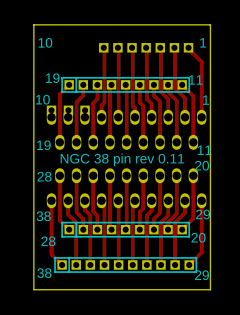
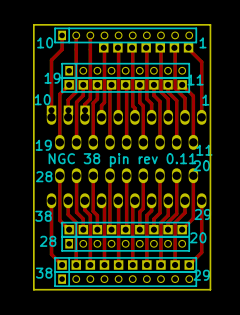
top track: none -> (62, 35) (62, 49) (51, 60) (51, 117)
top track: none -> (76, 35) (76, 91) (68, 99) (68, 117)
top track: none -> (90, 35) (90, 99) (84, 104) (84, 117)
part: none -> (125, 35)
part: none -> (125, 70)
part: none -> (125, 243)
part: none -> (125, 279)

